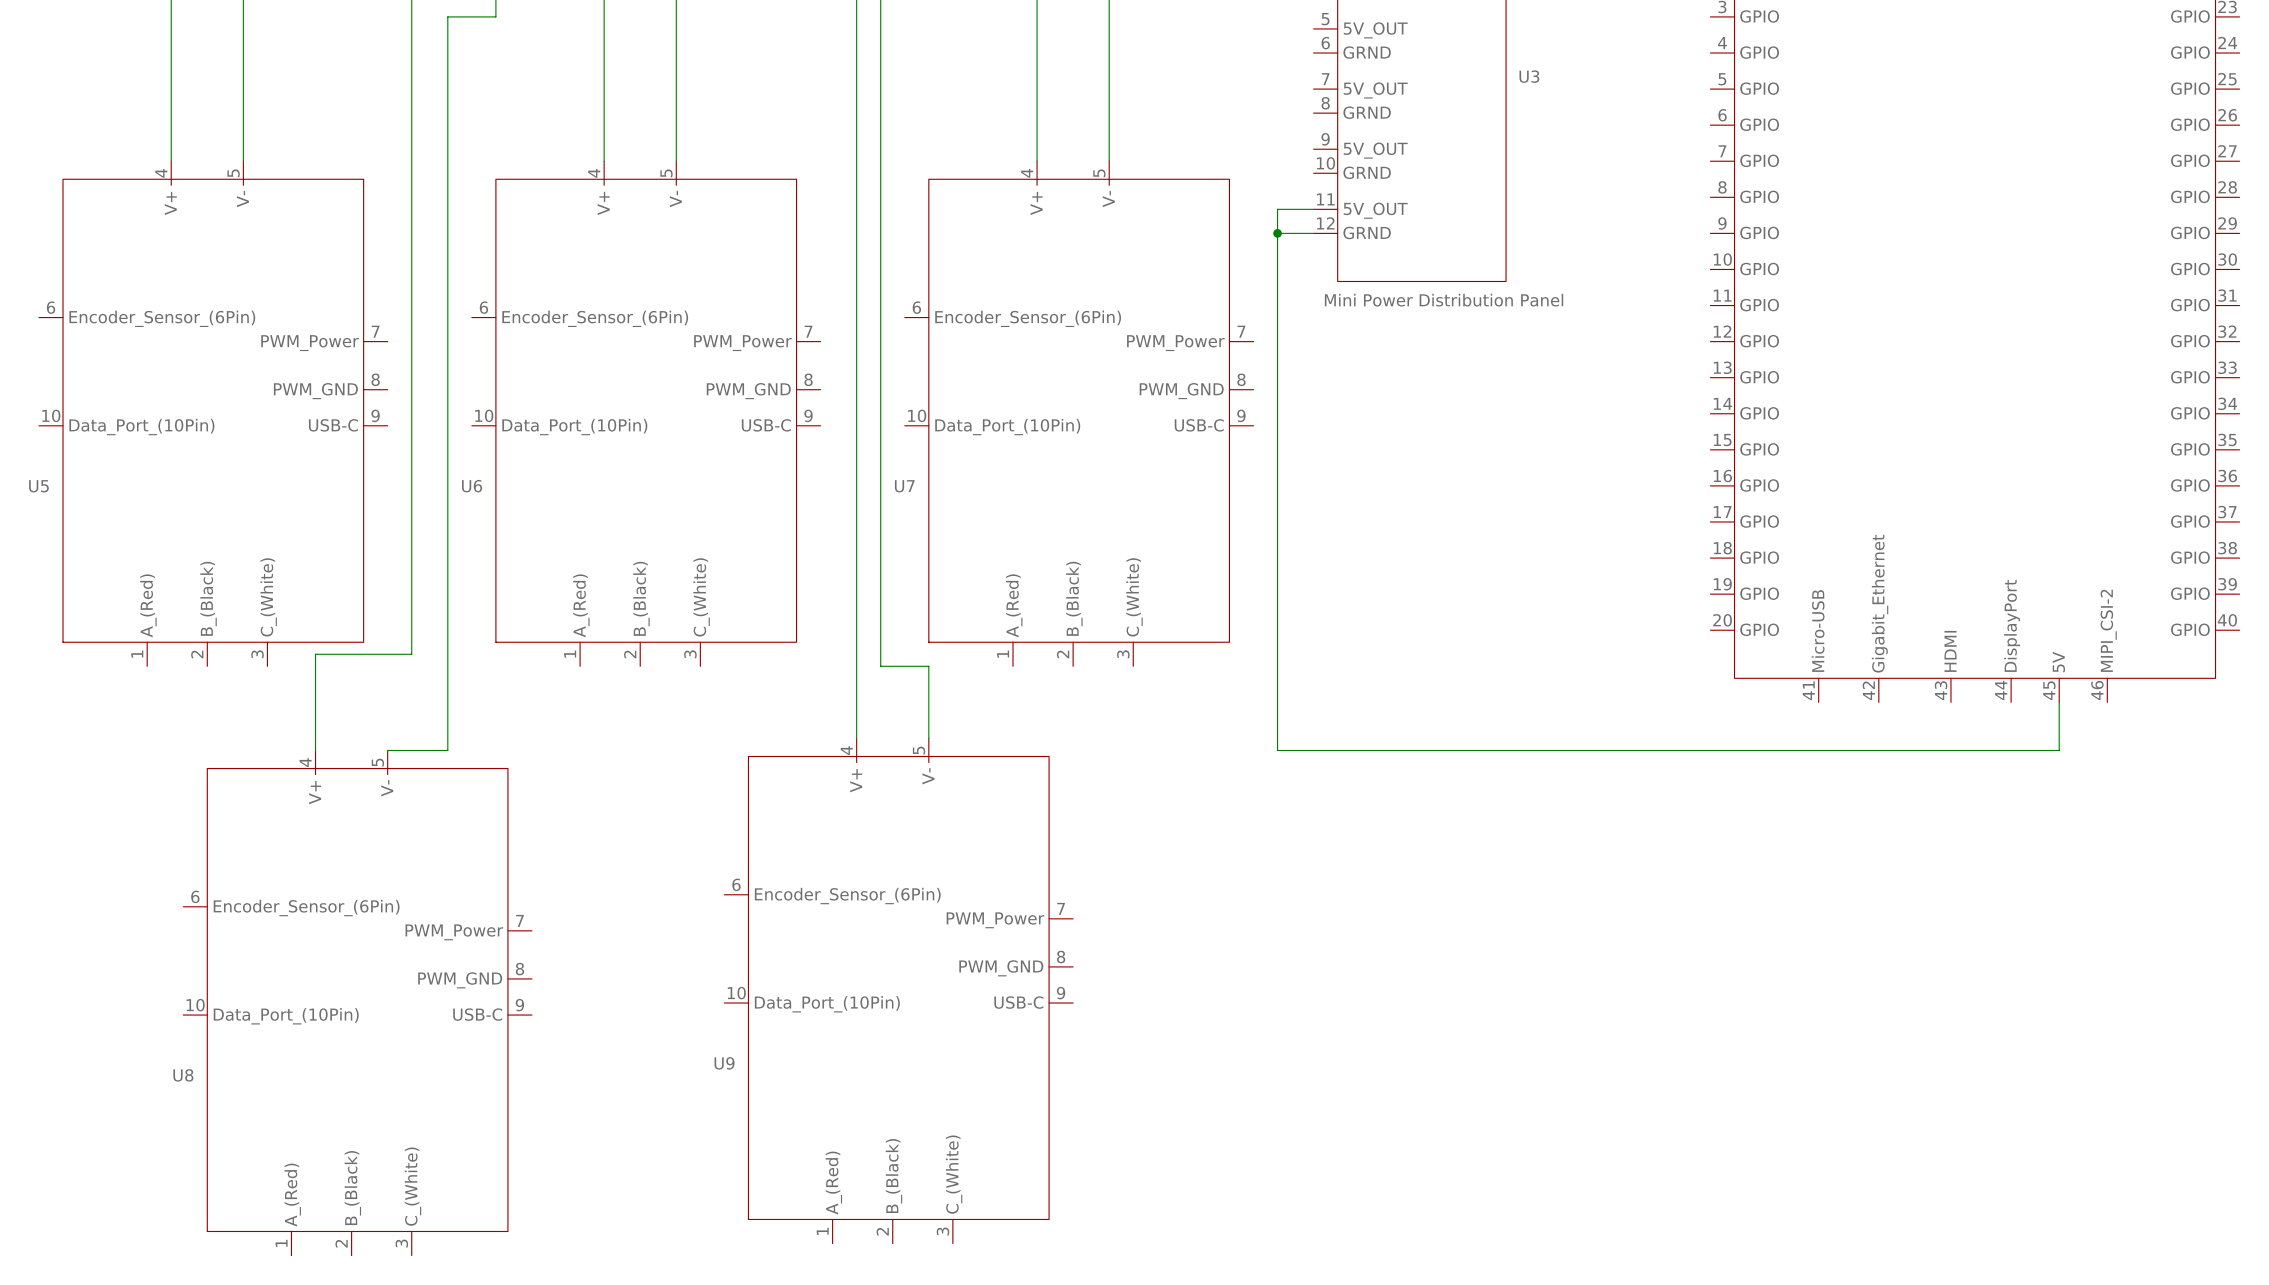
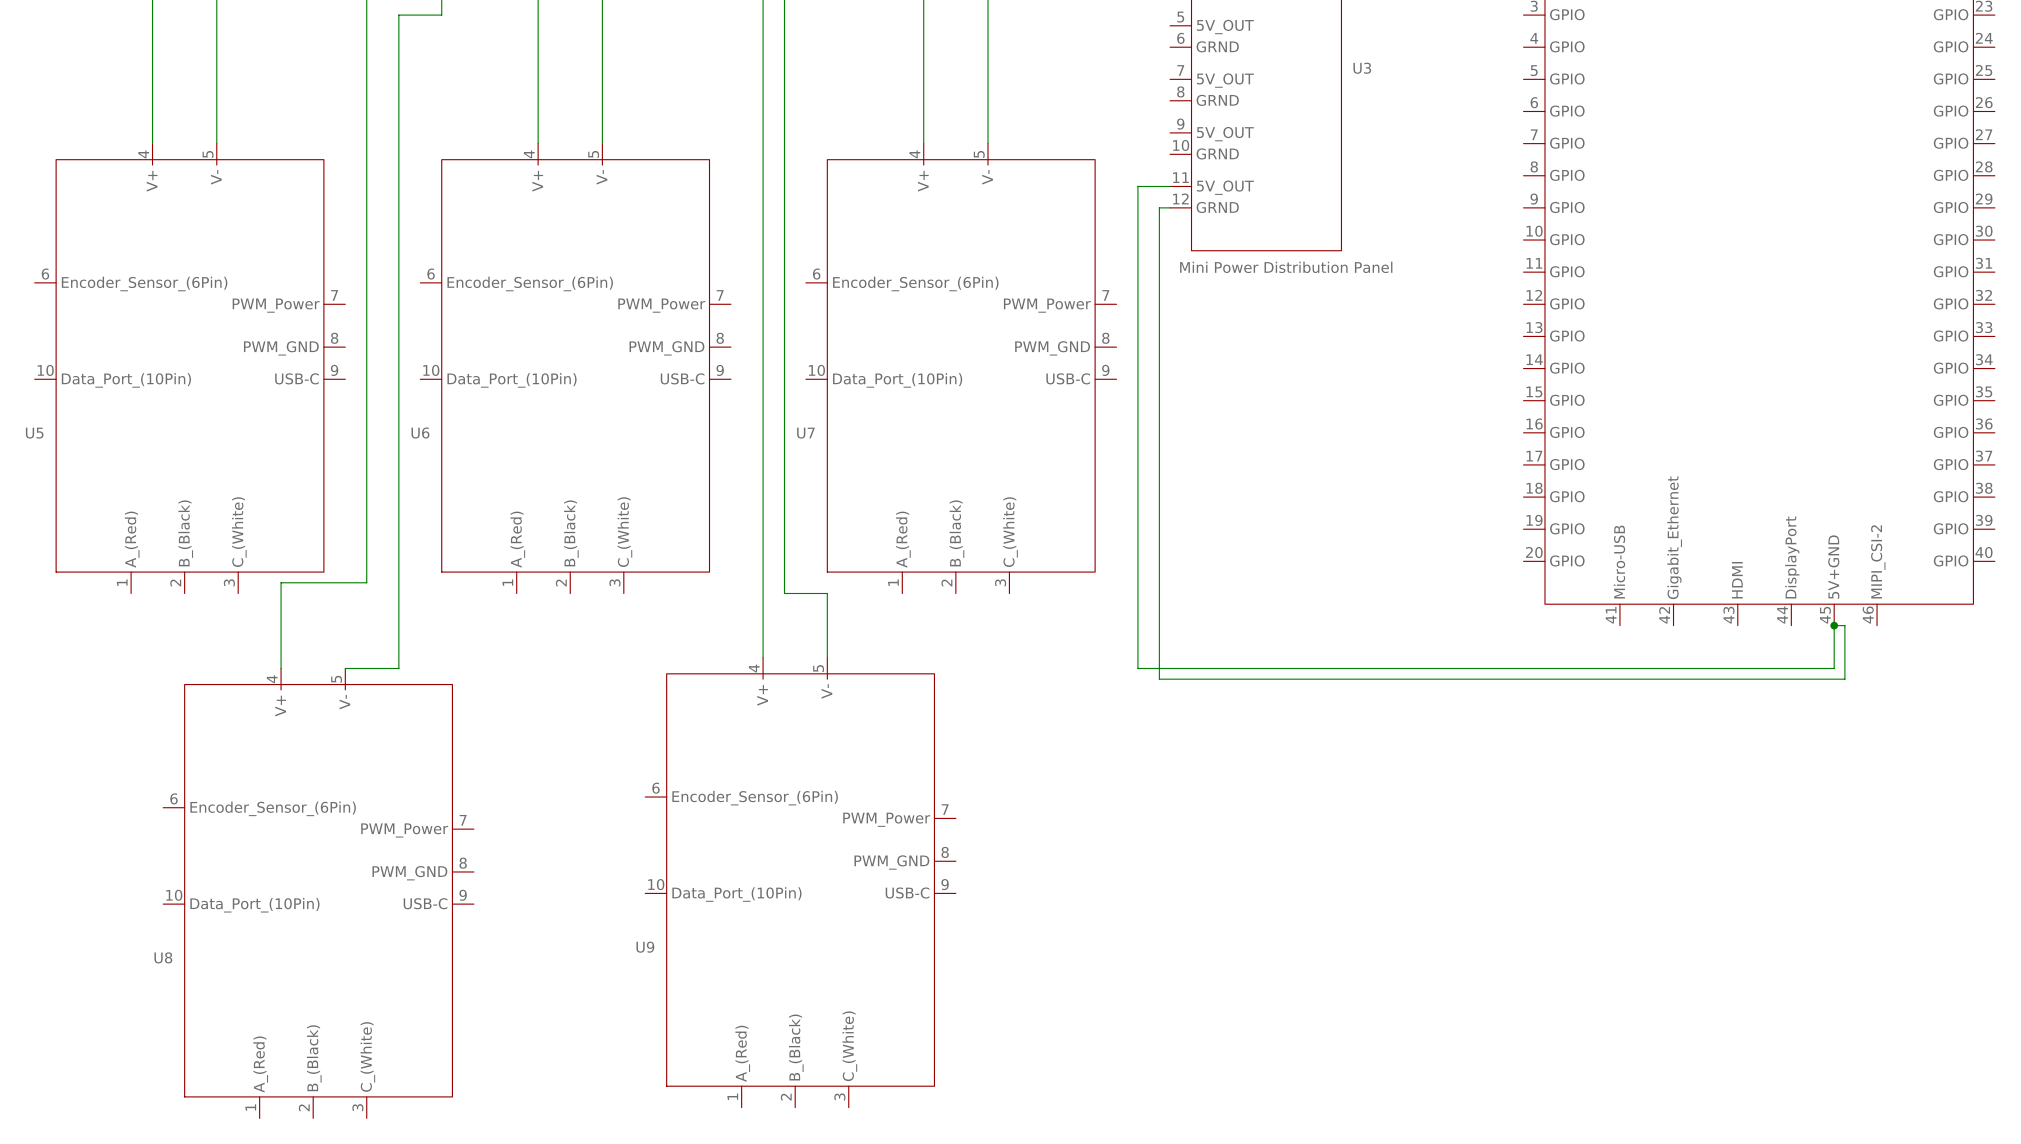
wire: (1277, 233) (1301, 233) -> (1834, 625) (1844, 625) (1844, 679) (1159, 679) (1159, 207)
junction: (1277, 233) -> none
part pin name: 5V (2058, 662) -> 5V+GND (1833, 567)
junction: none -> (1834, 625)

